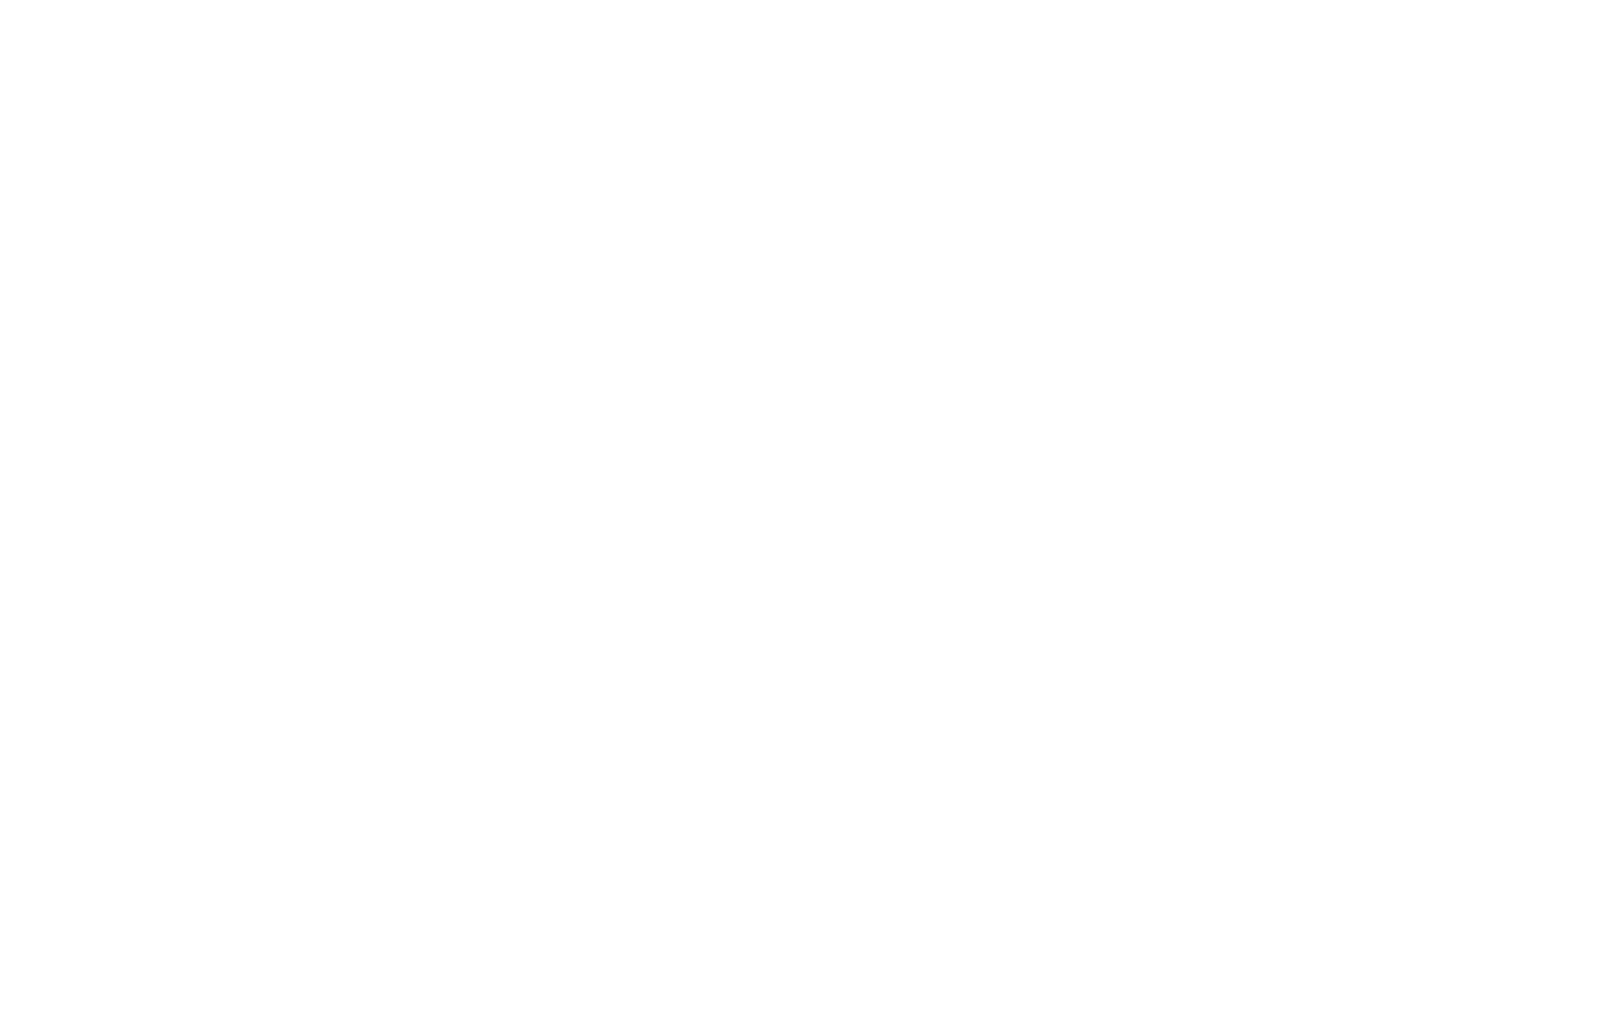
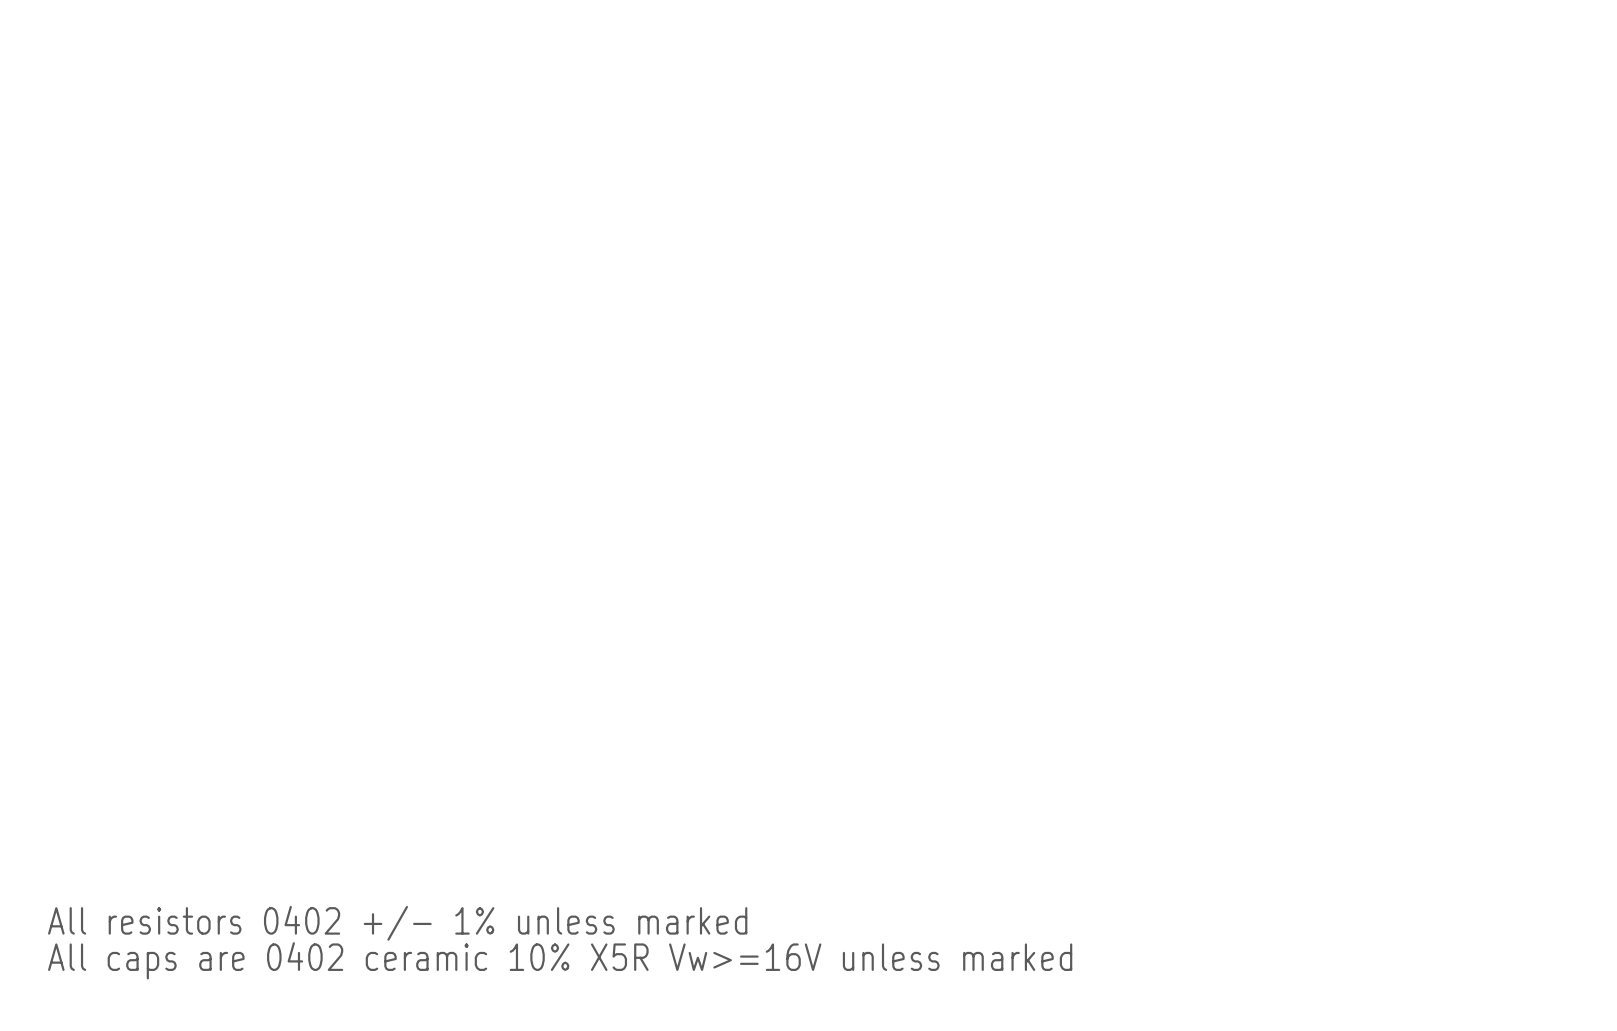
text: none -> All resistors 0402 +/- 1% unless marked (397, 923)
text: none -> All caps are 0402 ceramic 10% X5R Vw>=16V unless marked (560, 960)

